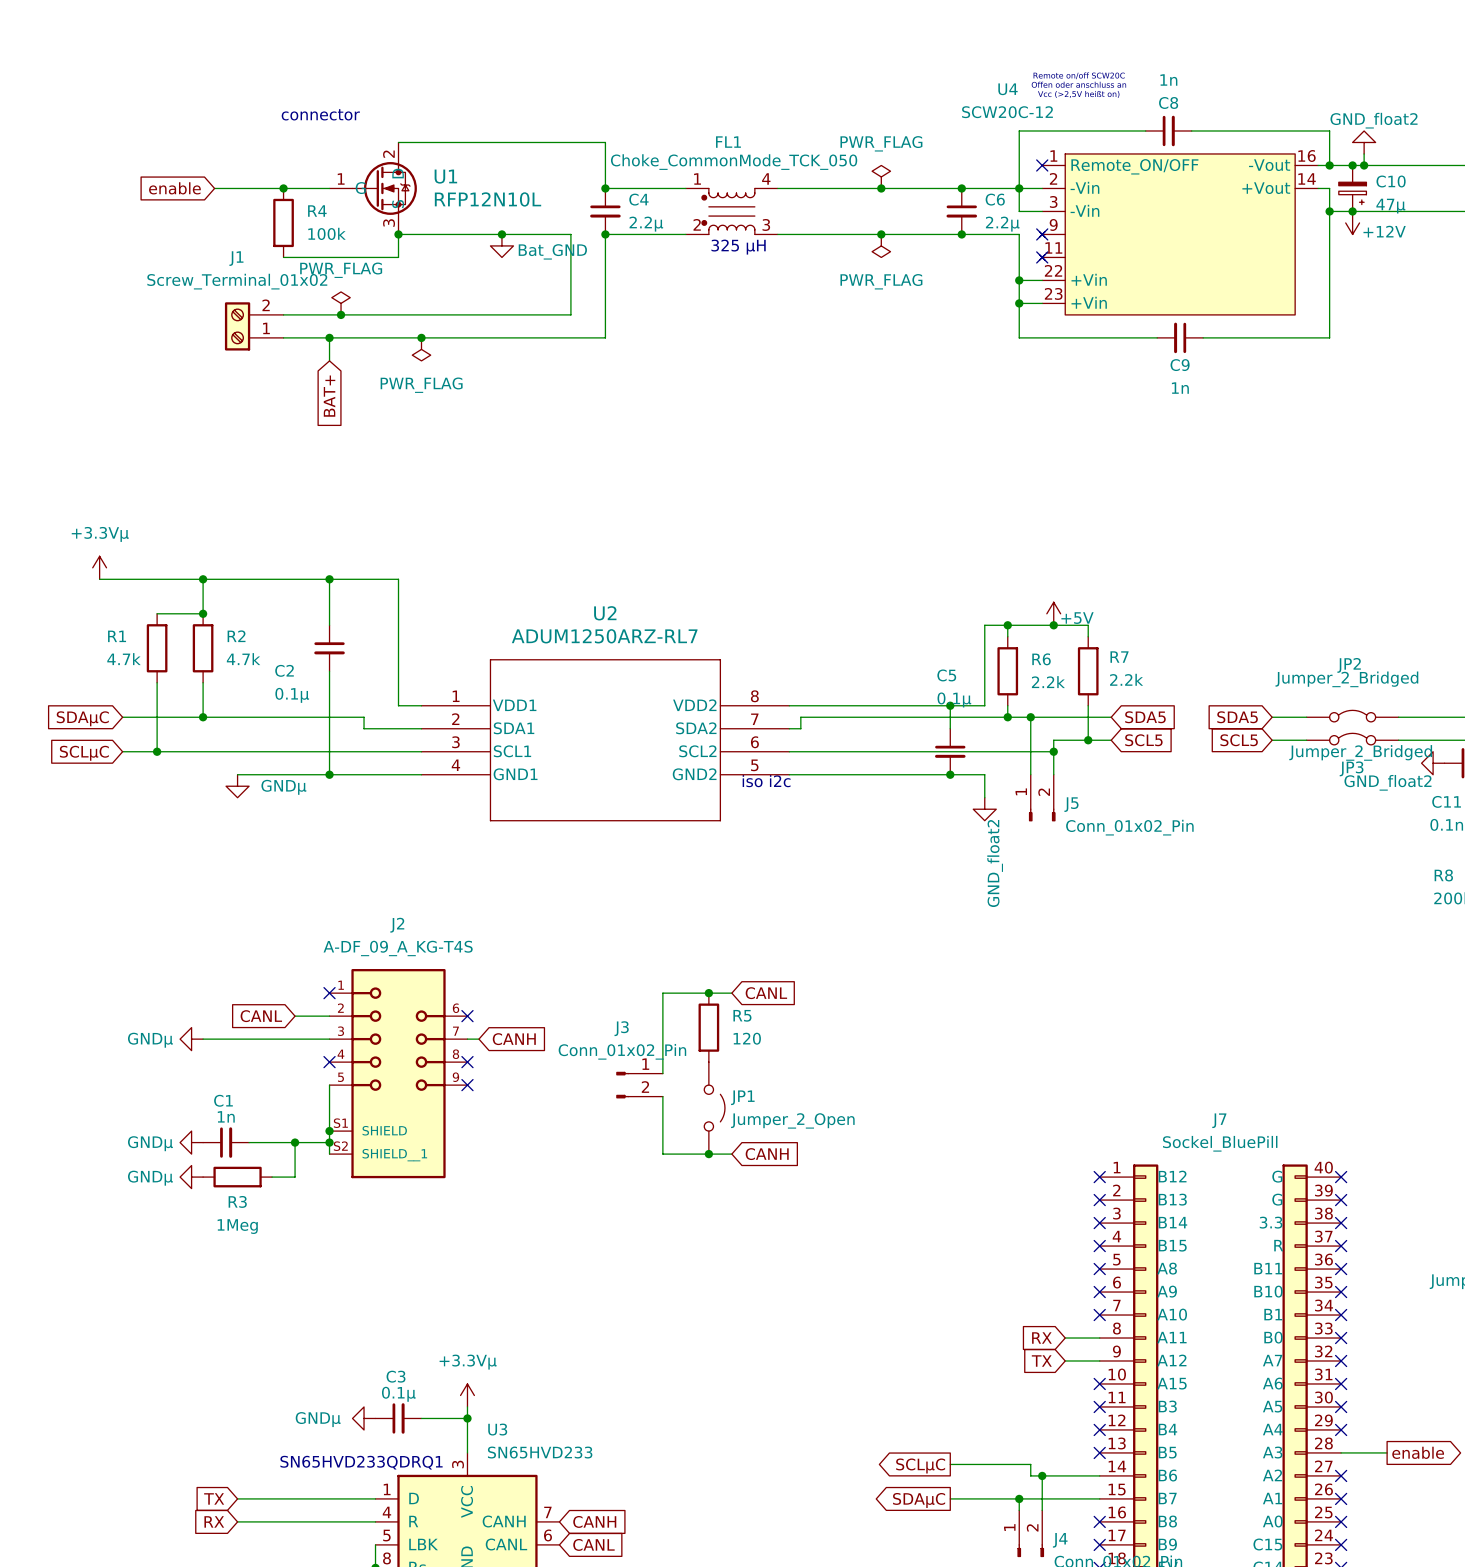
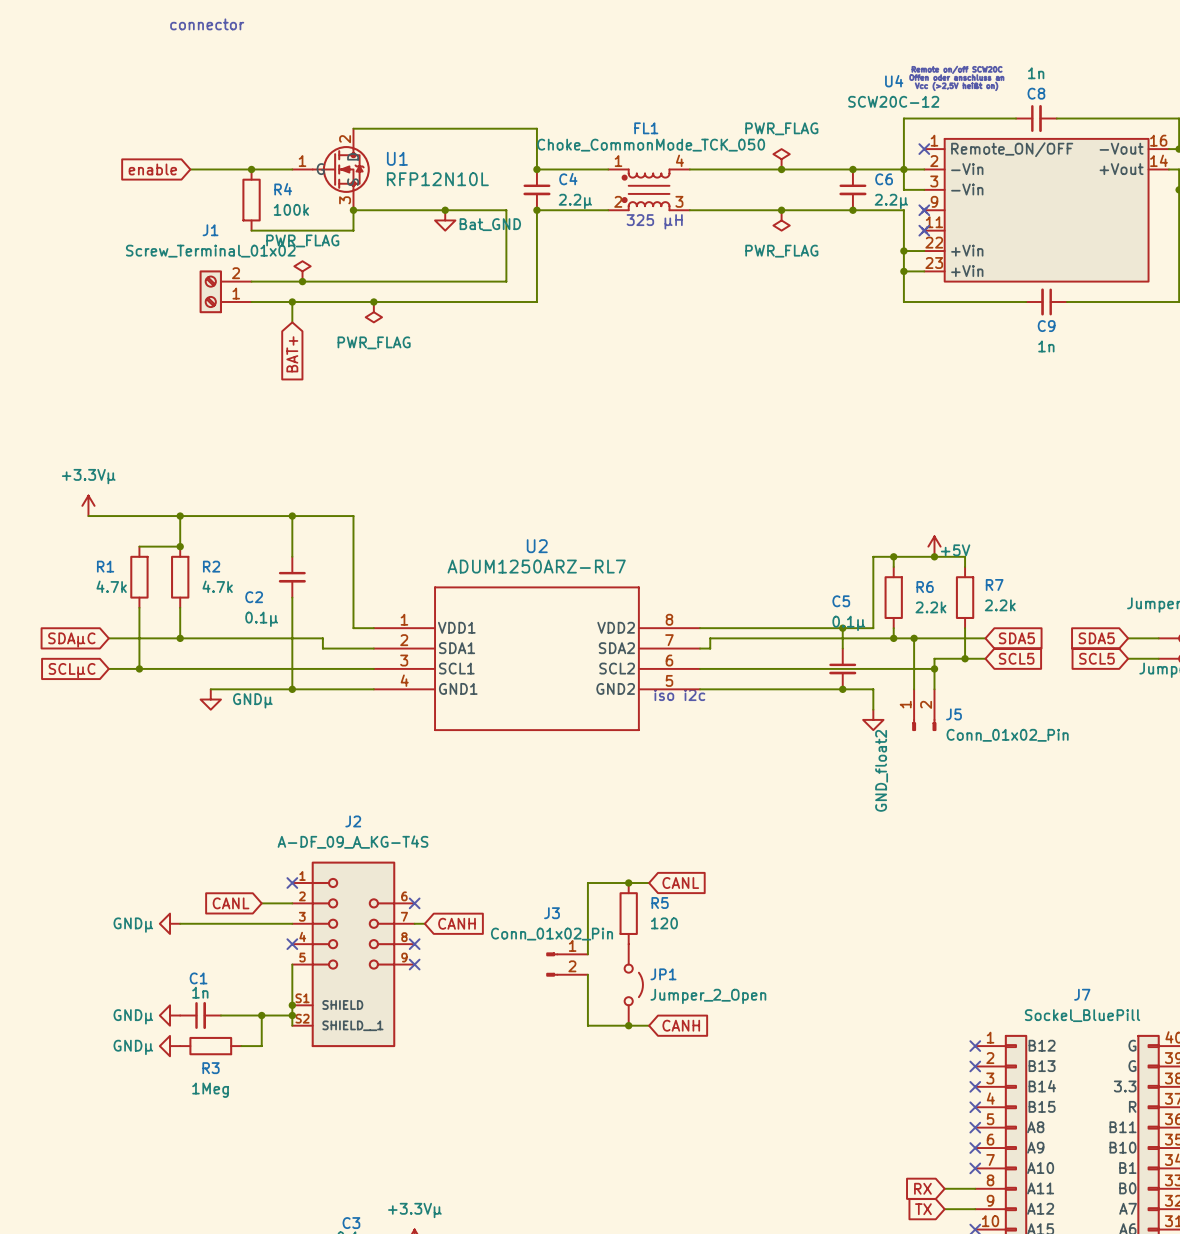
text position: connector (320, 114) -> connector (207, 24)

